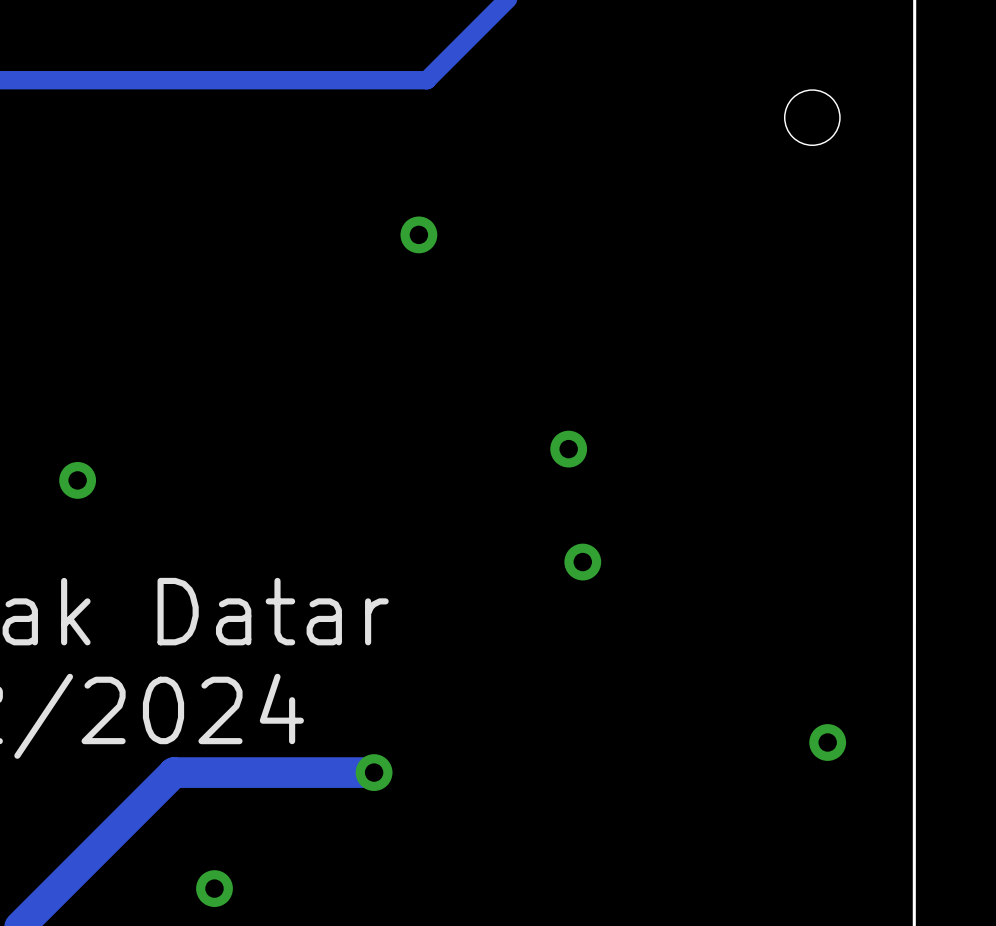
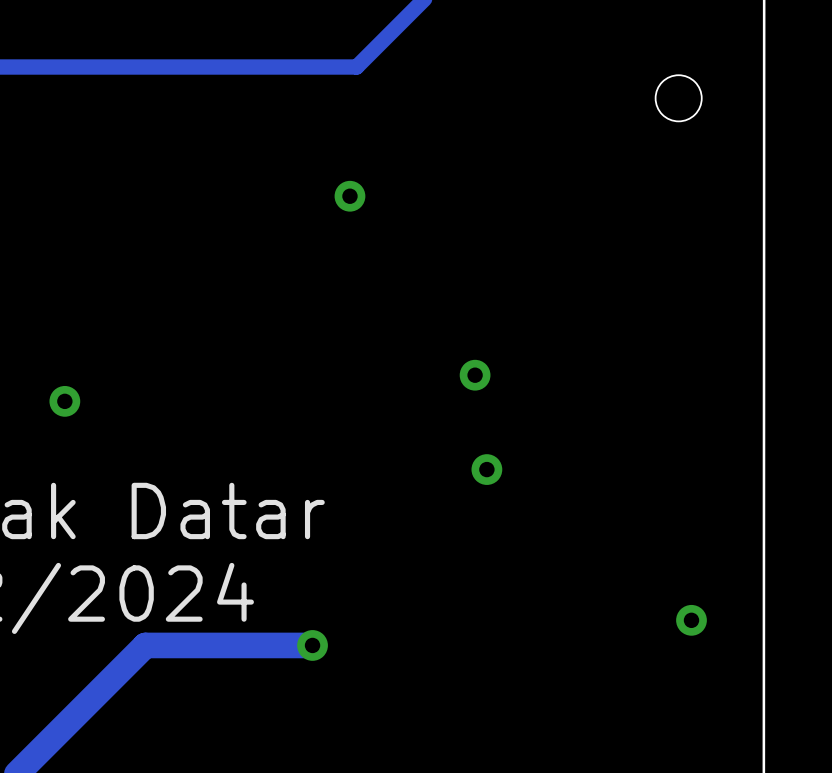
via: (214, 888) -> none

